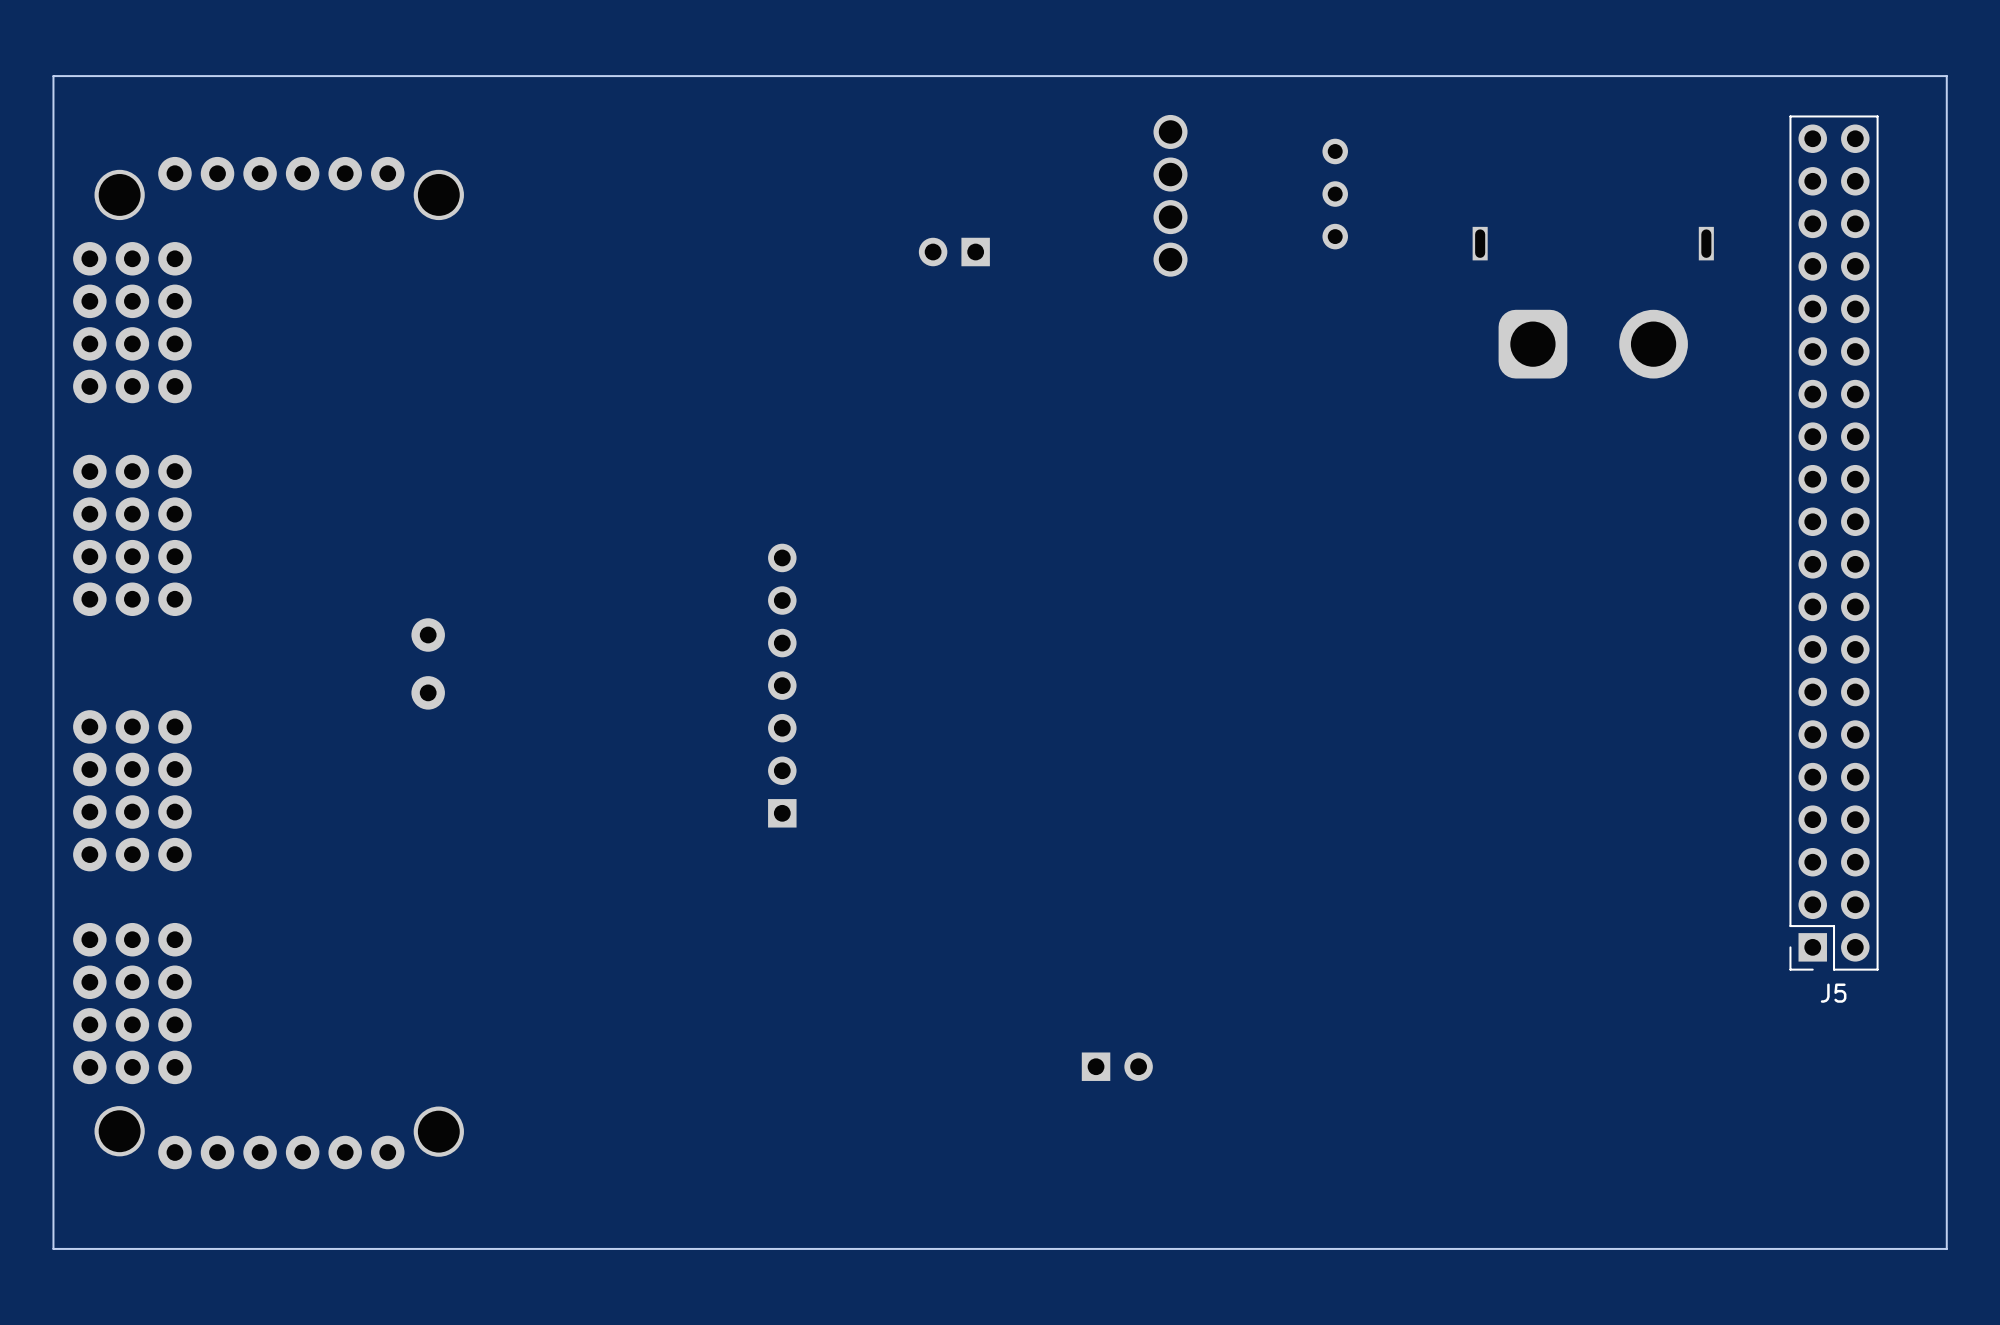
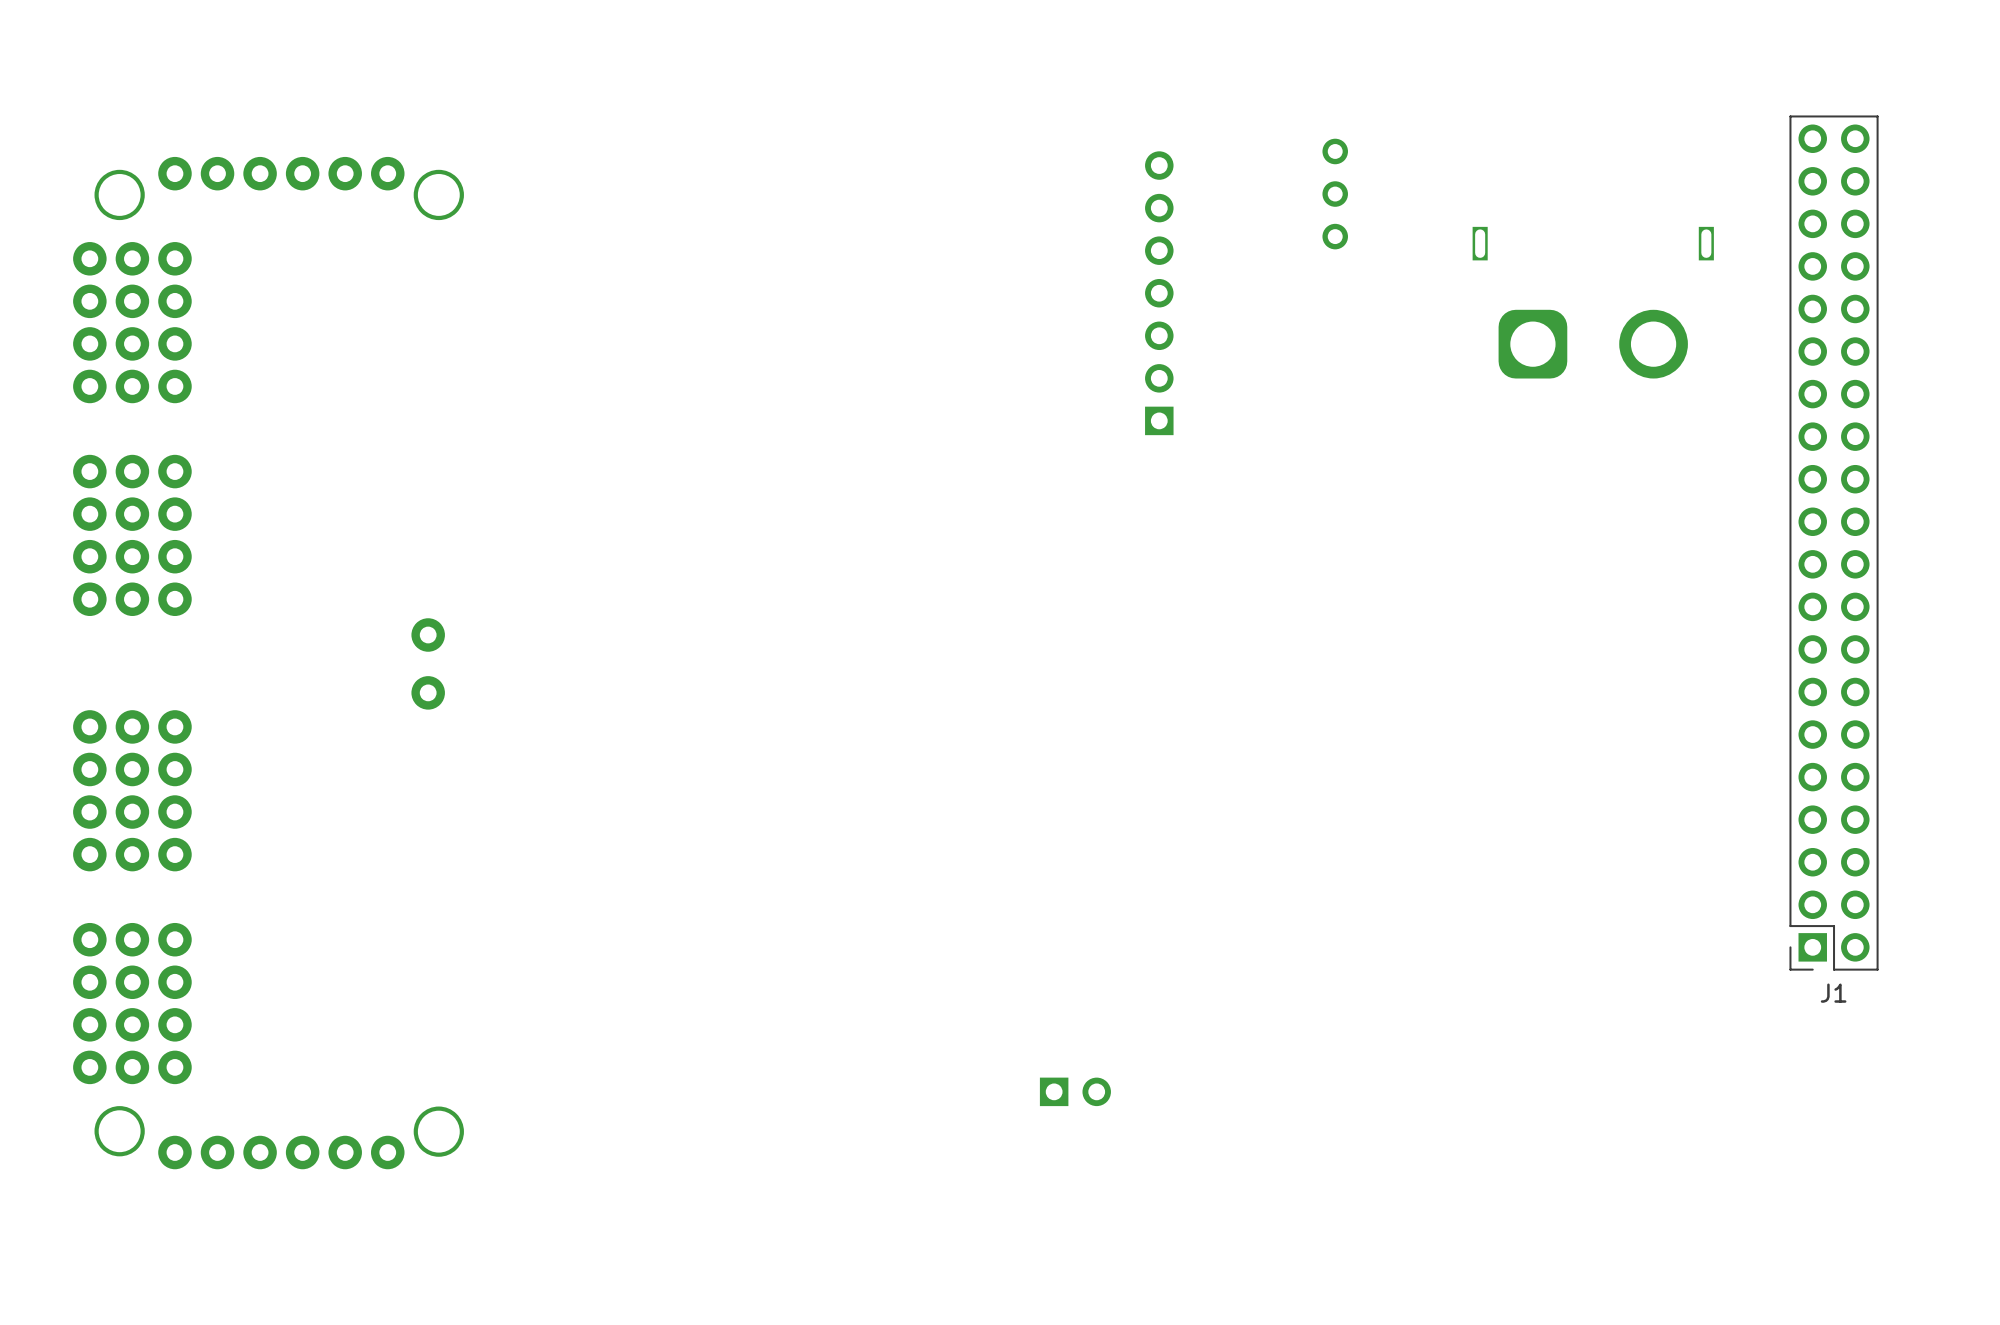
board edge: (1946, 76) (53, 76) (53, 1248) (1946, 1248) (1946, 76) -> none
part: (1170, 195) -> none
part: (954, 252) -> none
part: none -> (1159, 293)
part: (782, 685) -> none
J5 name: J5 (1833, 993) -> J1 (1833, 993)
part position: (1117, 1066) -> (1075, 1091)

